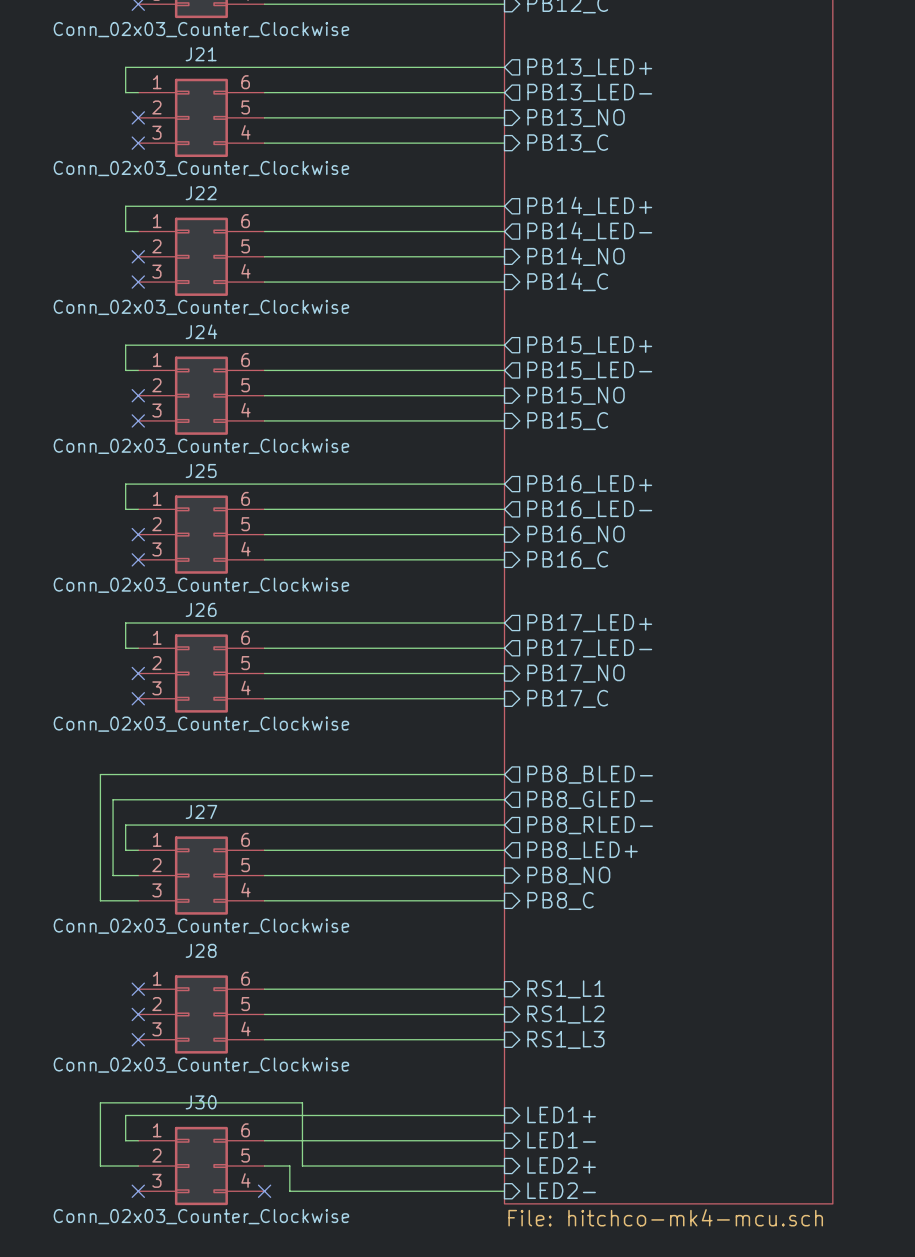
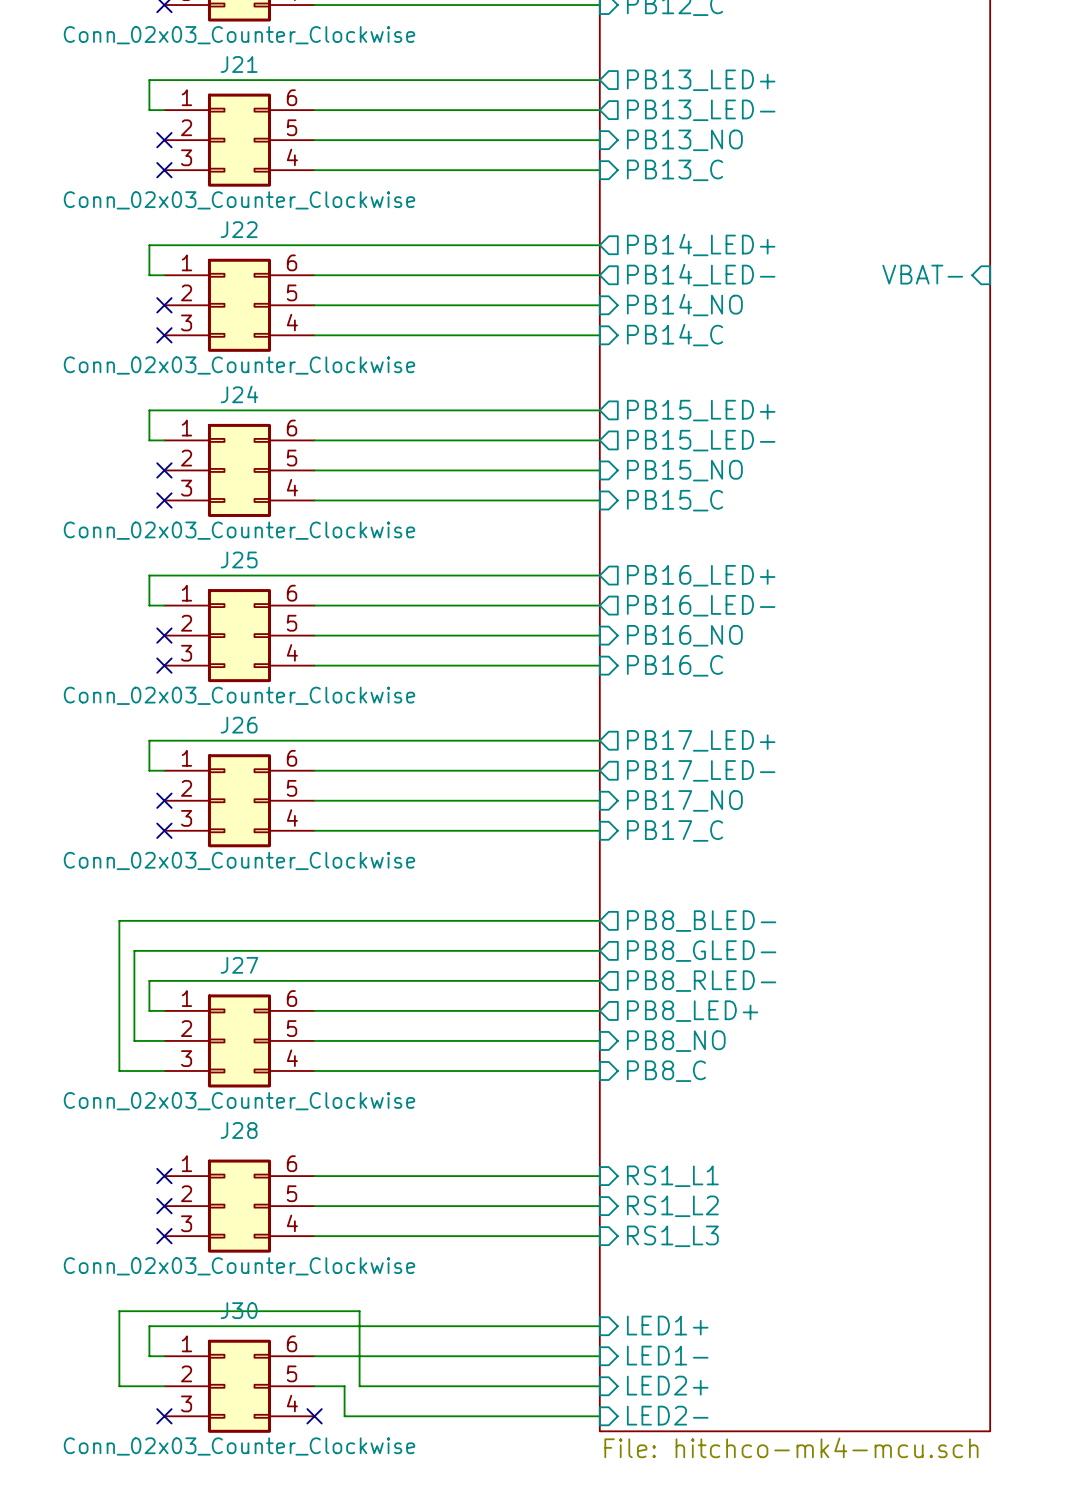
sheet pin: none -> VBAT- (922, 274)

